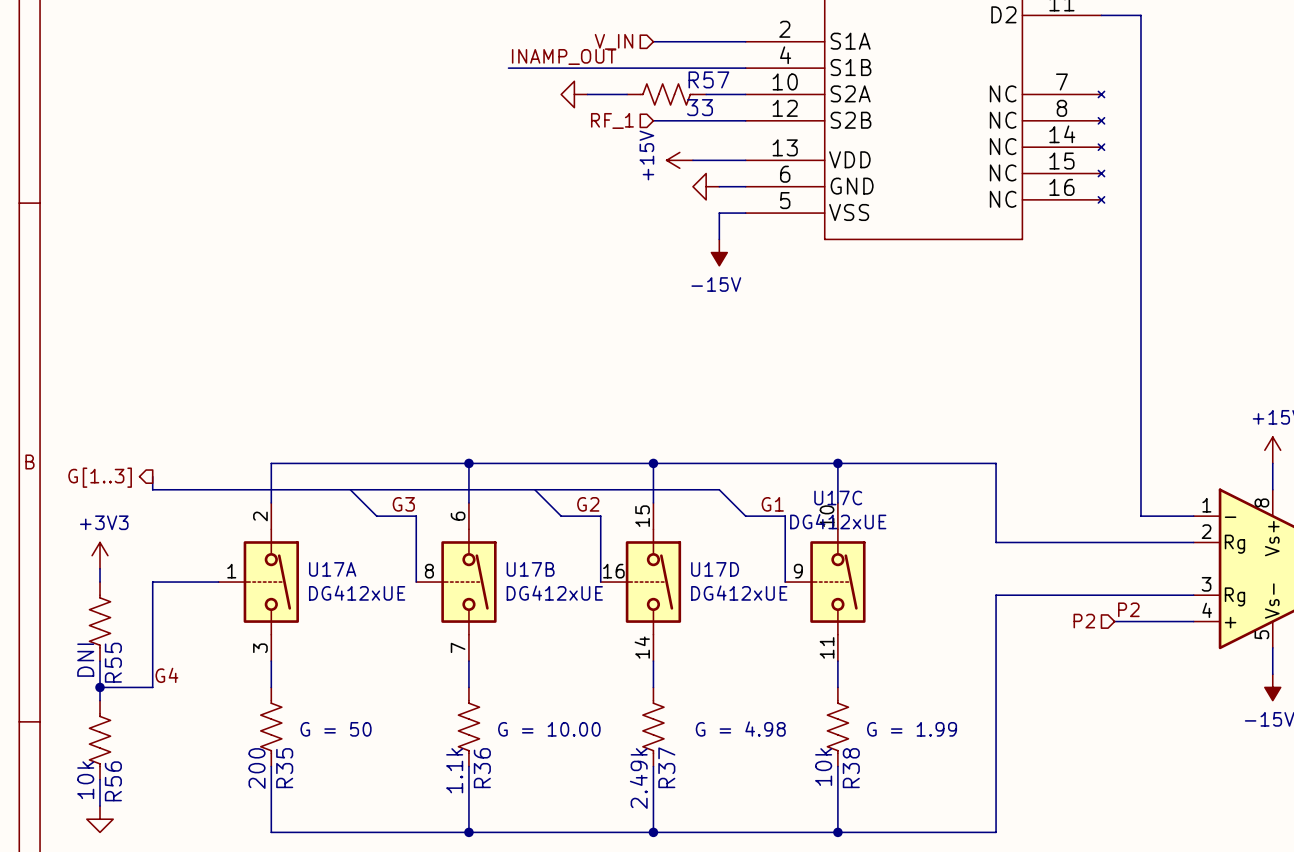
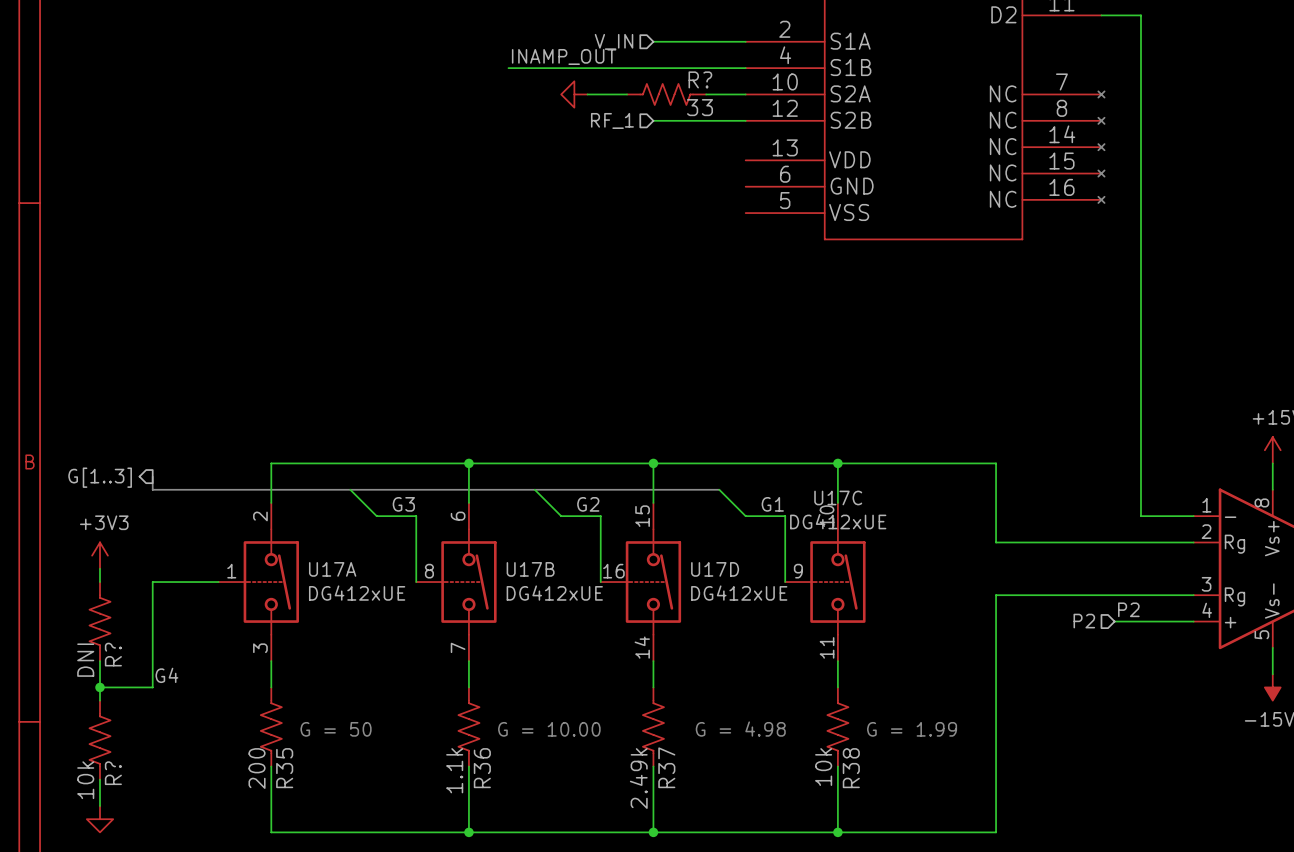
R57 name: R57 (708, 79) -> R? (700, 79)
power symbol: +15V (679, 160) -> none
wire: (692, 160) (745, 160) -> none
power symbol: (706, 186) -> none
wire: (719, 186) (745, 186) -> none
wire: (745, 213) (719, 213) (719, 239) -> none
power symbol: -15V (719, 252) -> none
R55 name: R55 (113, 662) -> R? (113, 654)
R56 name: R56 (113, 781) -> R? (113, 773)

